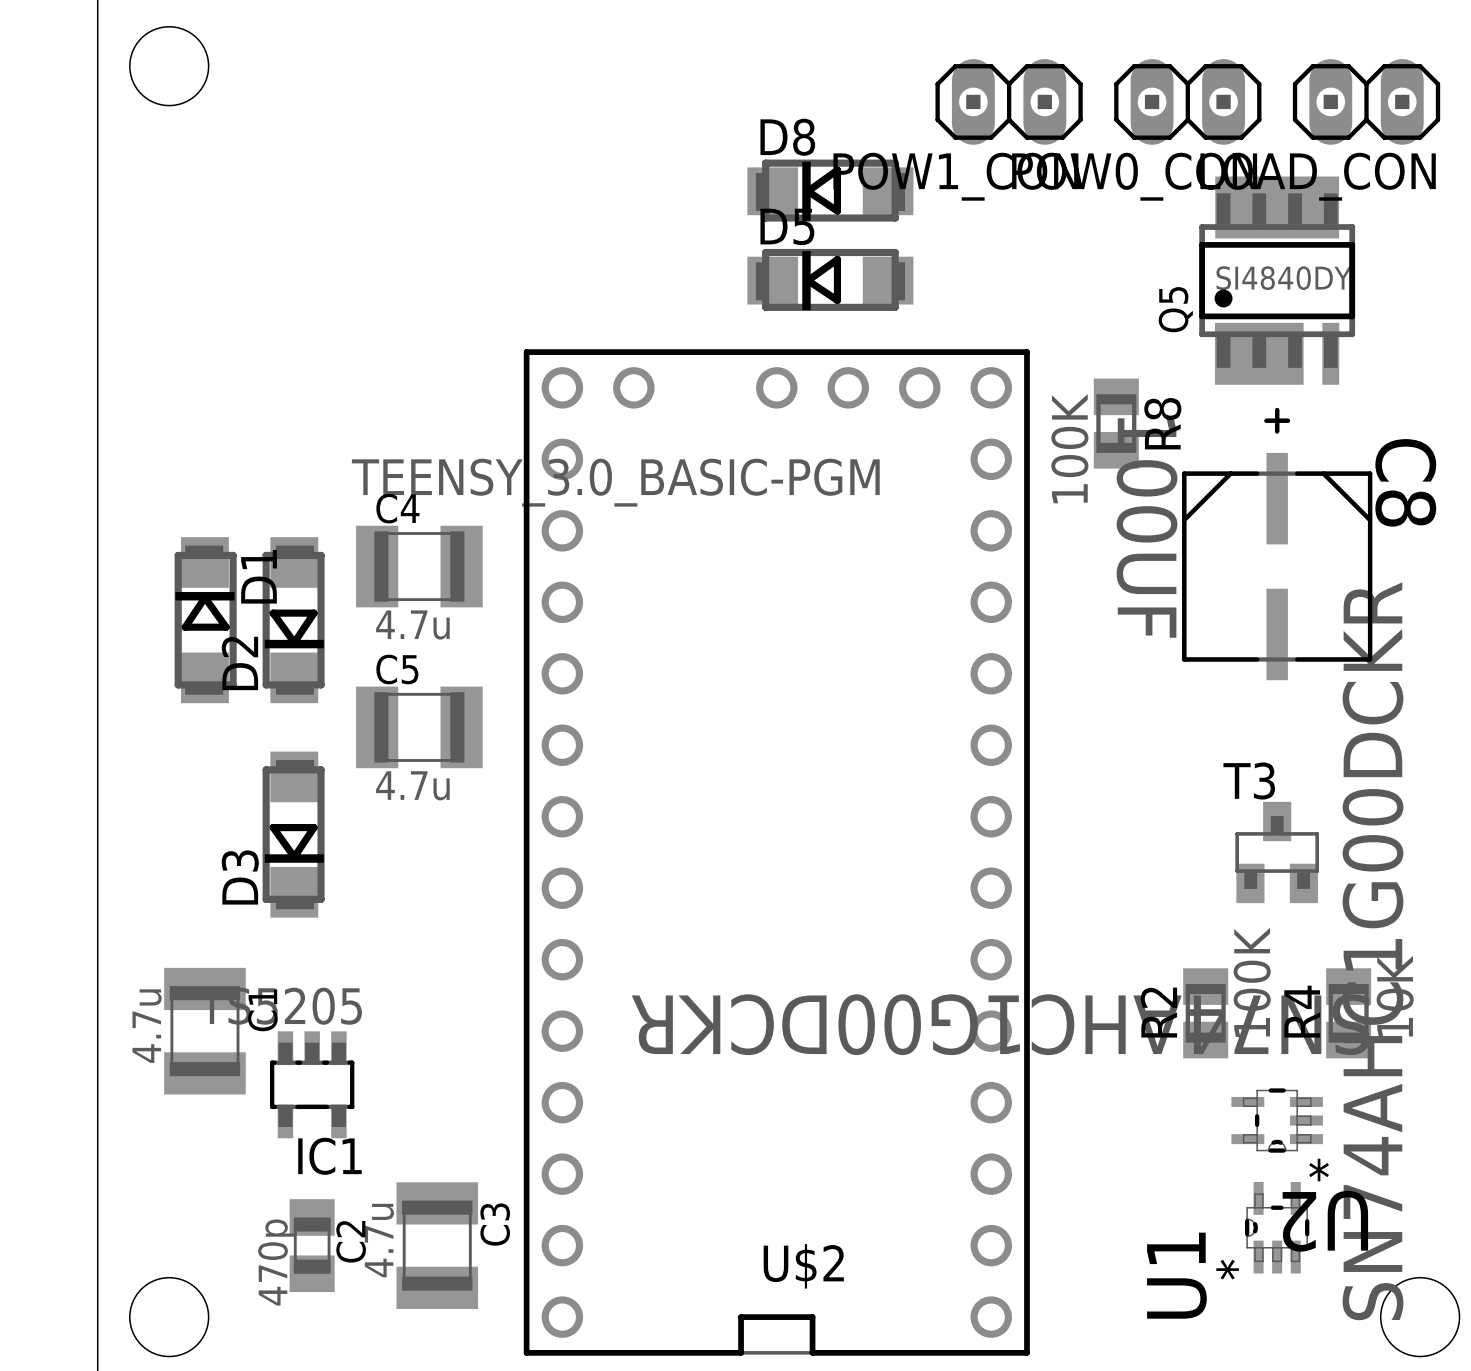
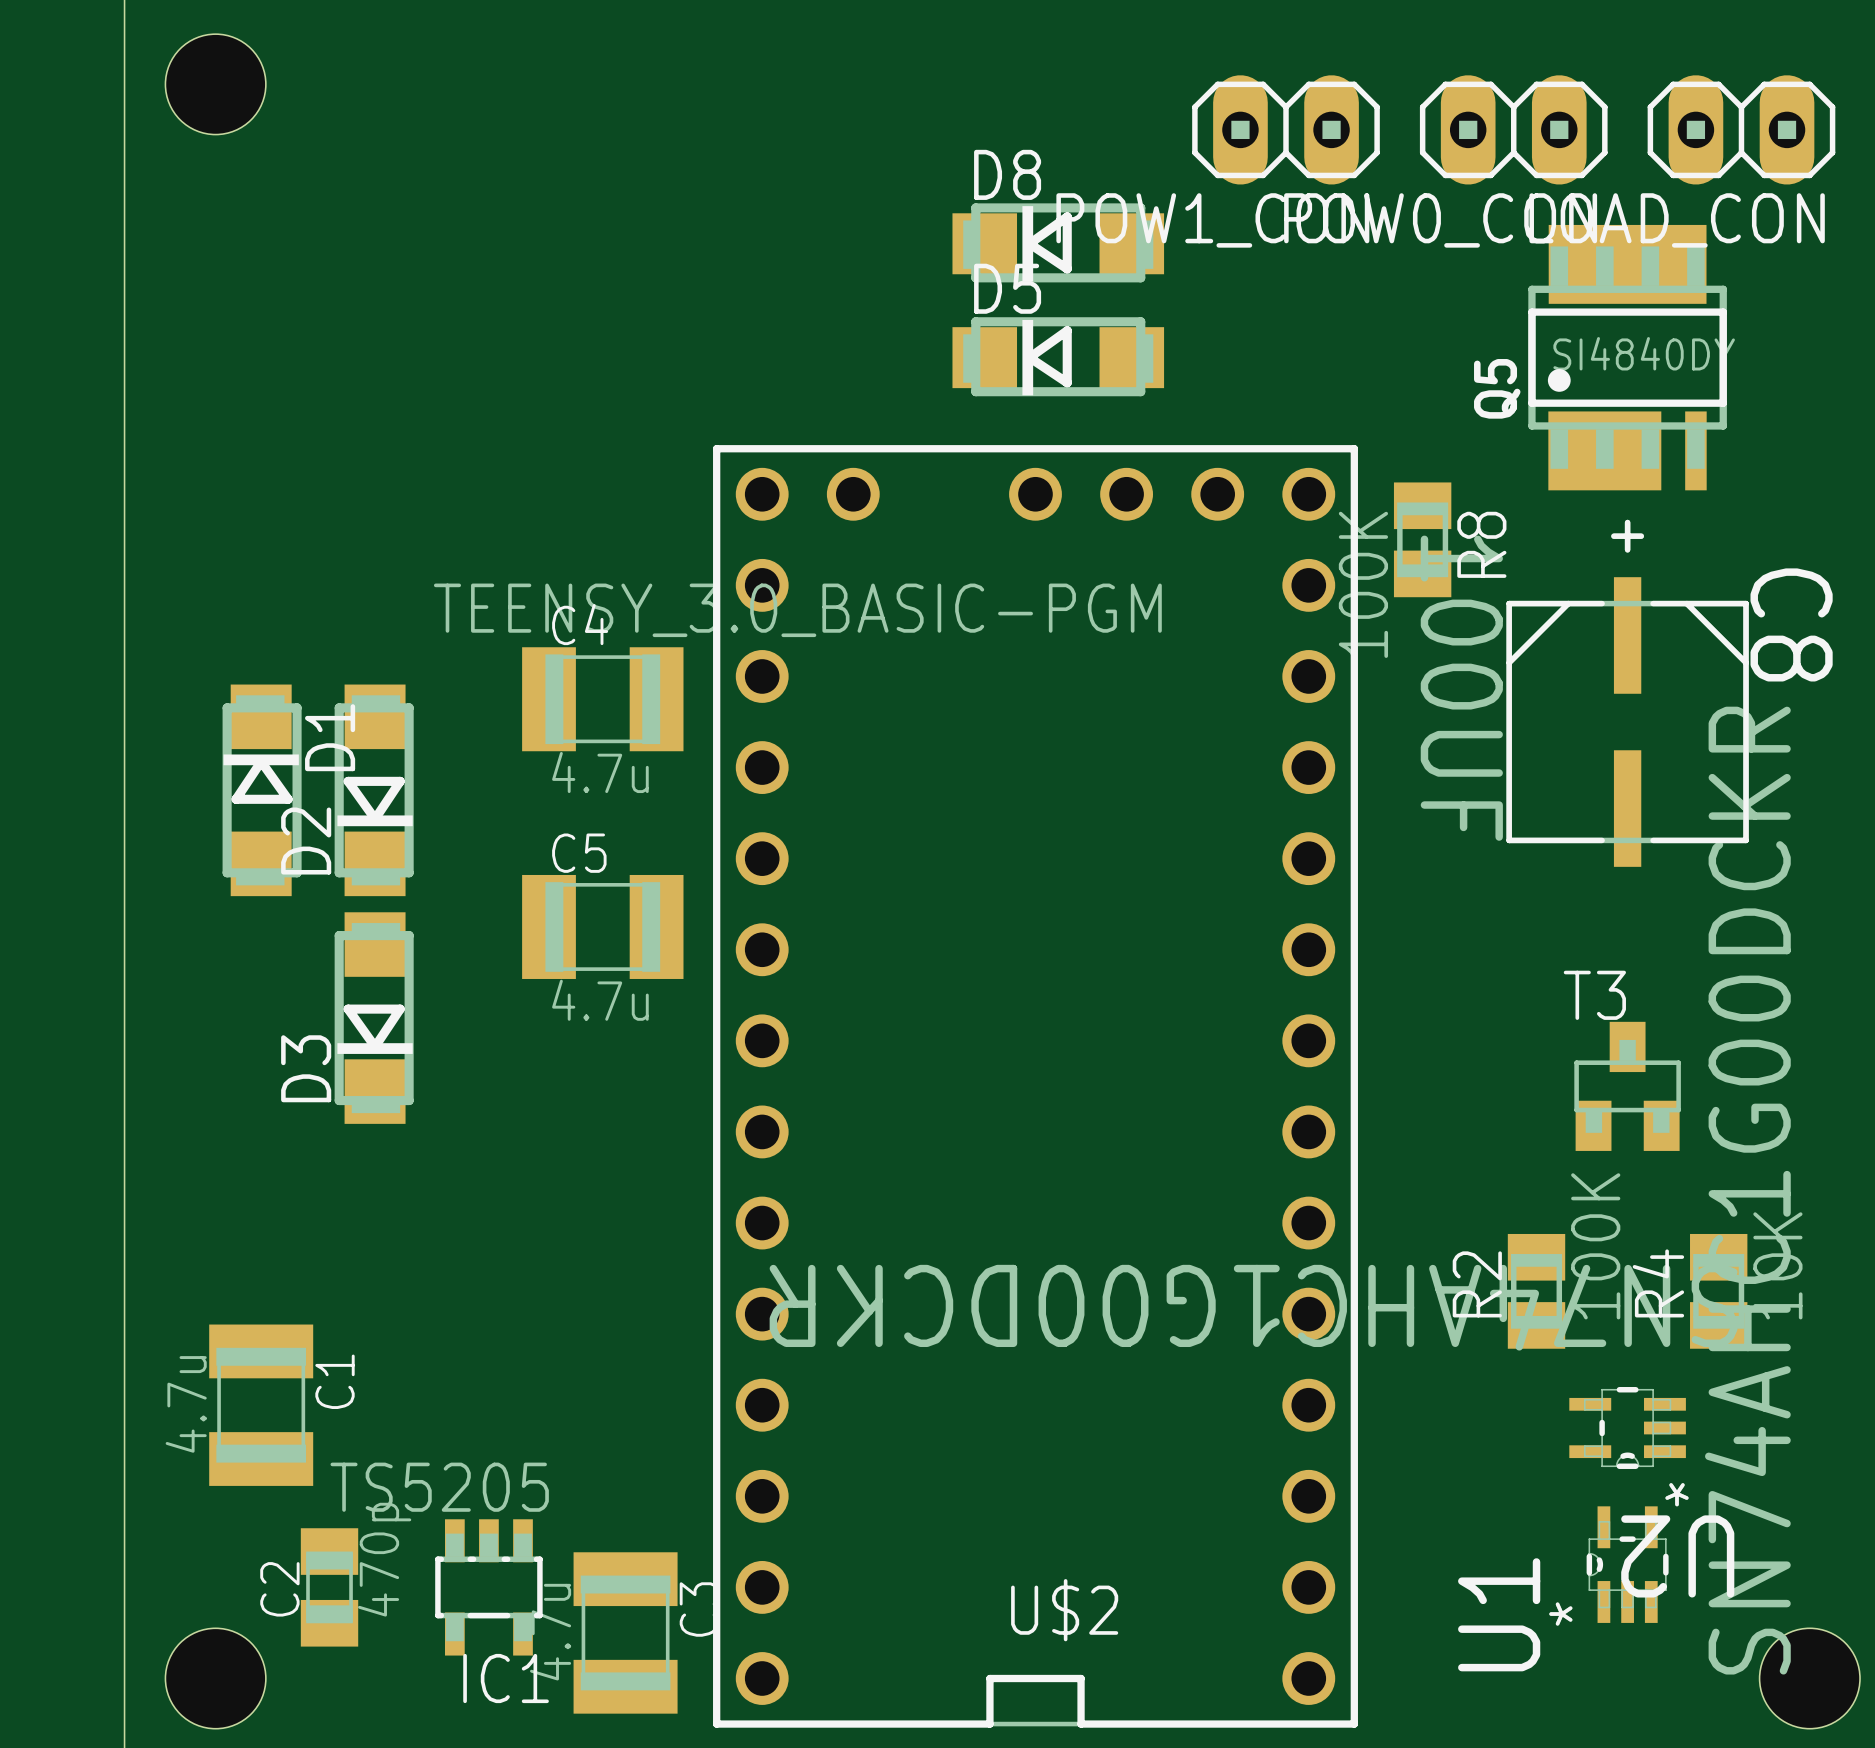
C4 position: (419, 566) -> (602, 699)
C5 position: (419, 727) -> (602, 926)
D3 position: (293, 834) -> (374, 1018)
U$2 position: (776, 852) -> (1035, 1086)
C1 position: (204, 1031) -> (261, 1405)
IC1 position: (312, 1084) -> (488, 1587)
C2 name position: C2 (351, 1241) -> C2 (279, 1589)
C2 position: (312, 1245) -> (329, 1587)
C3 position: (437, 1245) -> (625, 1632)
C2 value position: 470p (276, 1262) -> 470p (384, 1559)

